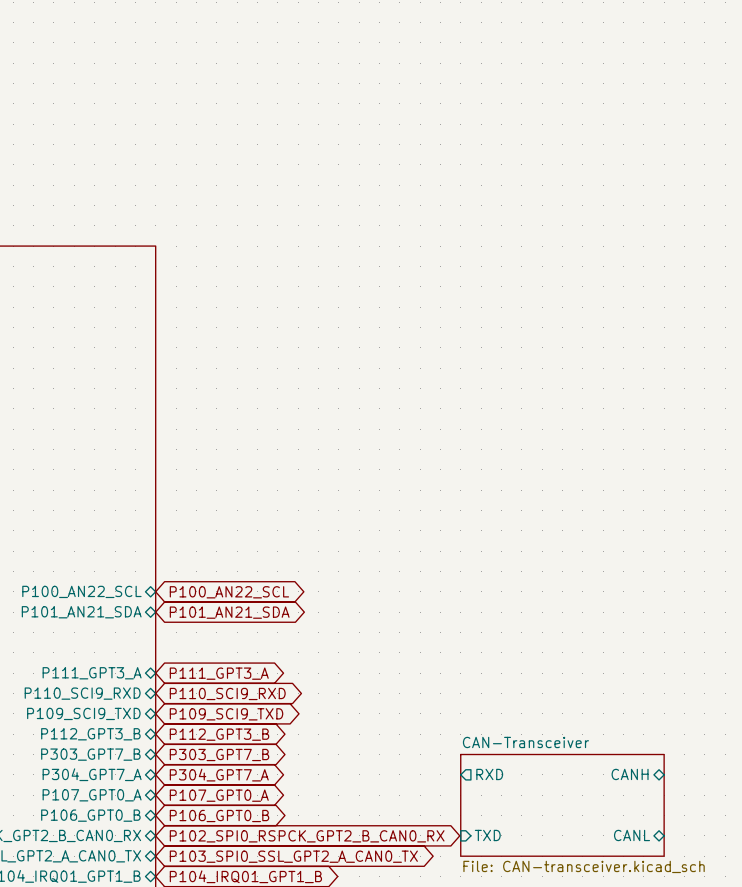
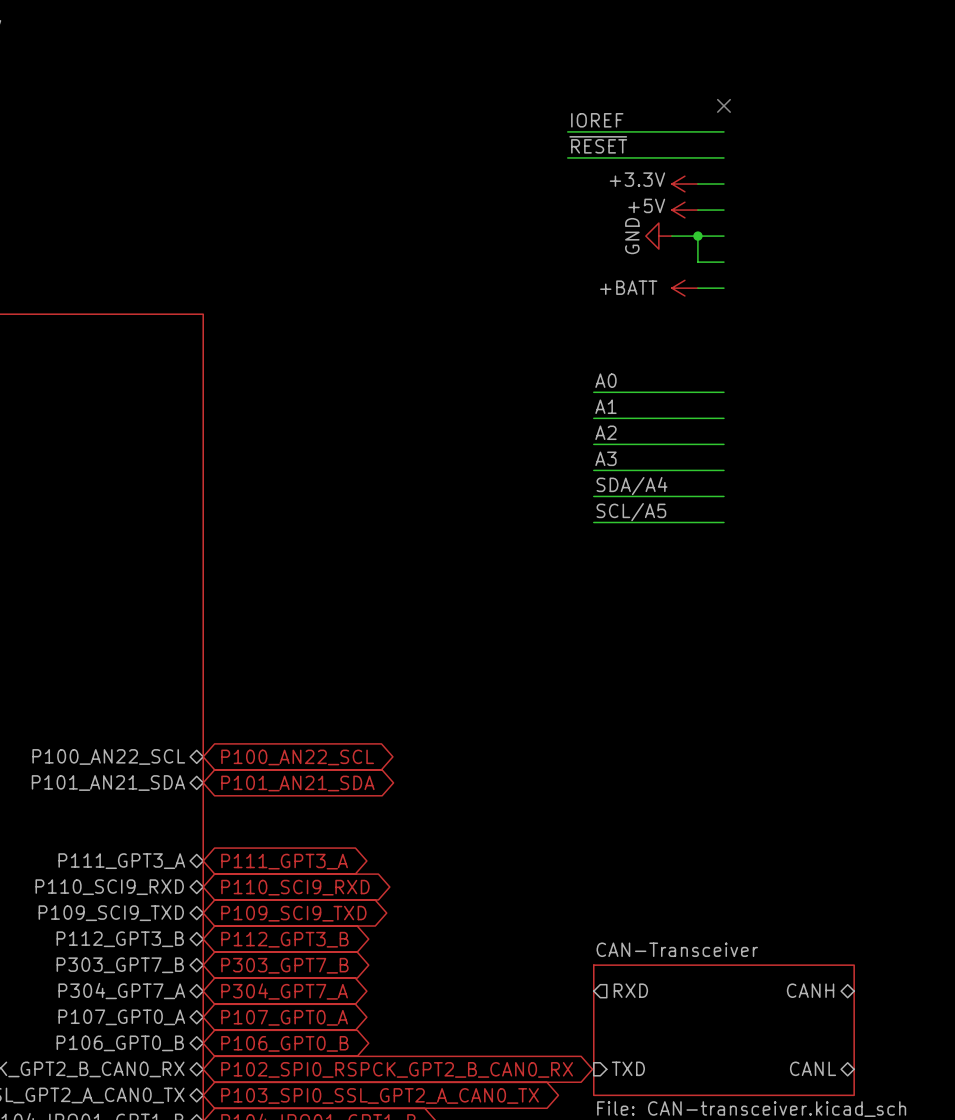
no-connect mark: none -> (723, 105)
label: none -> IOREF (597, 120)
wire: none -> (567, 131) (723, 131)
label: none -> ~{RESET} (598, 144)
wire: none -> (567, 157) (723, 157)
power symbol: none -> +3.3V (684, 184)
wire: none -> (697, 184) (723, 184)
power symbol: none -> +5V (684, 210)
wire: none -> (697, 210) (723, 210)
power symbol: none -> GND (658, 236)
wire: none -> (671, 236) (723, 236)
wire: none -> (697, 236) (697, 262) (723, 262)
junction: none -> (697, 236)
power symbol: none -> +BATT (684, 288)
wire: none -> (697, 288) (723, 288)
label: none -> A0 (605, 380)
wire: none -> (593, 392) (723, 392)
label: none -> A1 (605, 406)
wire: none -> (593, 418) (723, 418)
label: none -> A2 (605, 432)
wire: none -> (593, 444) (723, 444)
label: none -> A3 (605, 458)
wire: none -> (593, 470) (723, 470)
label: none -> SDA/A4 (632, 486)
wire: none -> (593, 496) (723, 496)
label: none -> SCL/A5 (631, 512)
wire: none -> (593, 522) (723, 522)

